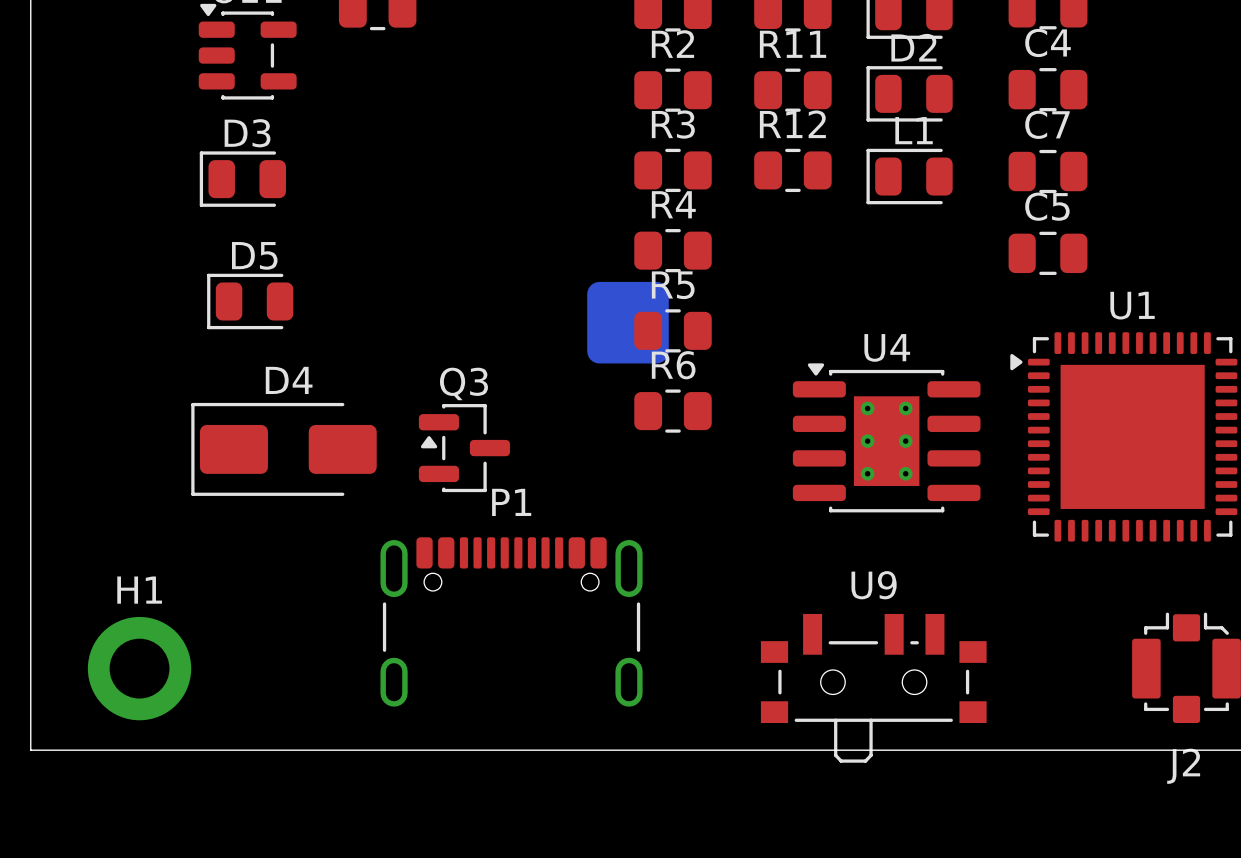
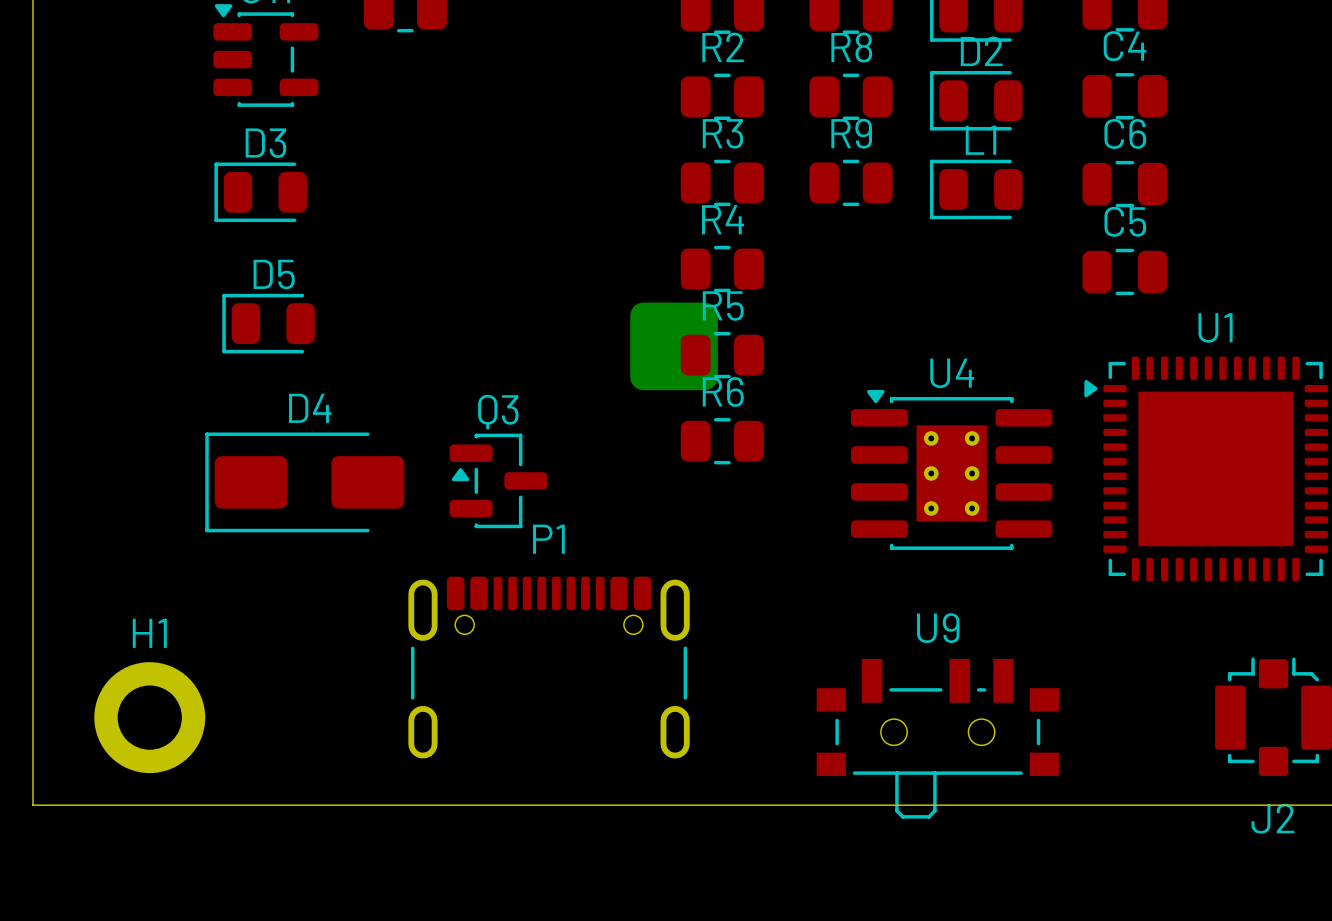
R11 name: R11 (793, 44) -> R8 (851, 47)
R12 name: R12 (792, 124) -> R9 (851, 133)
C7 name: C7 (1047, 124) -> C6 (1125, 133)

